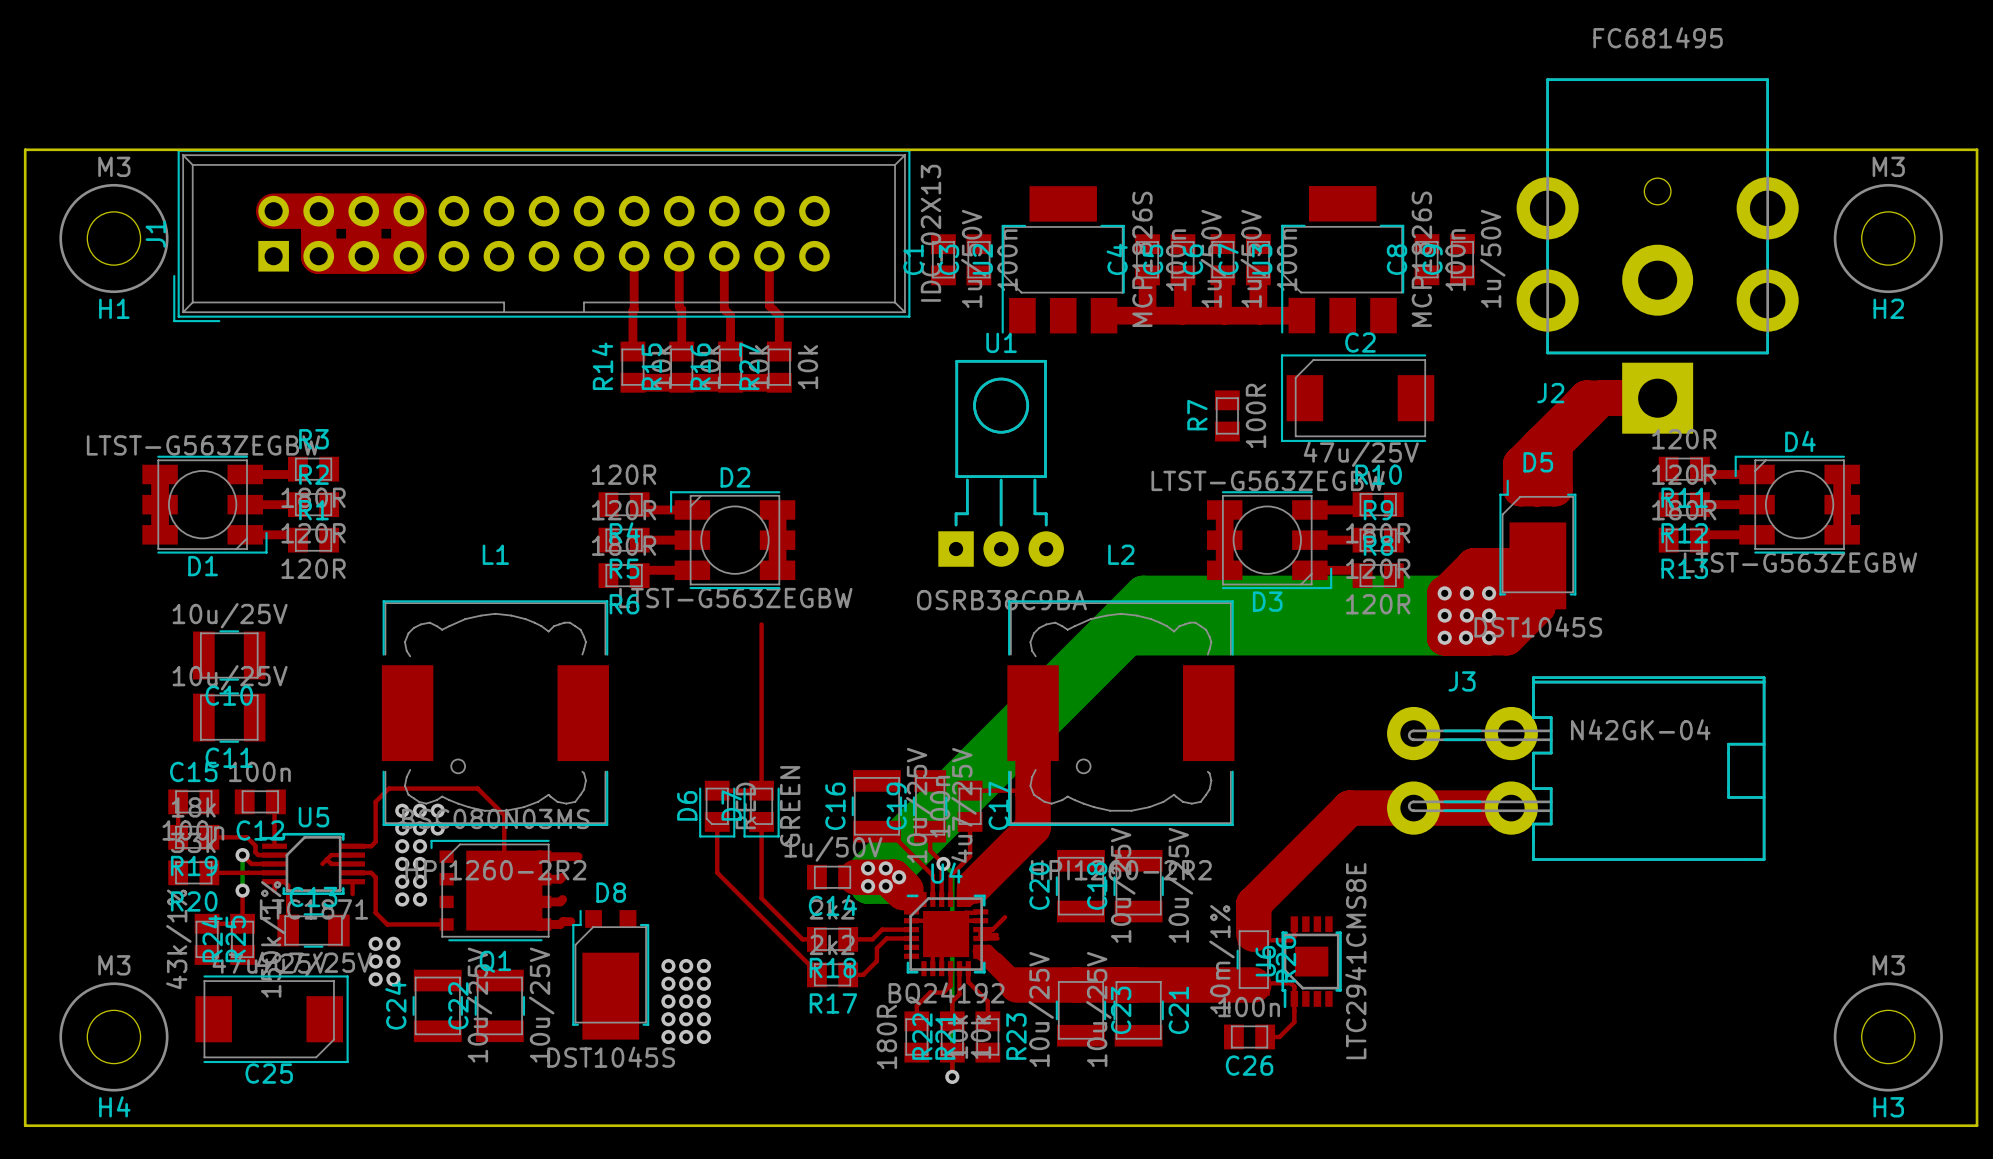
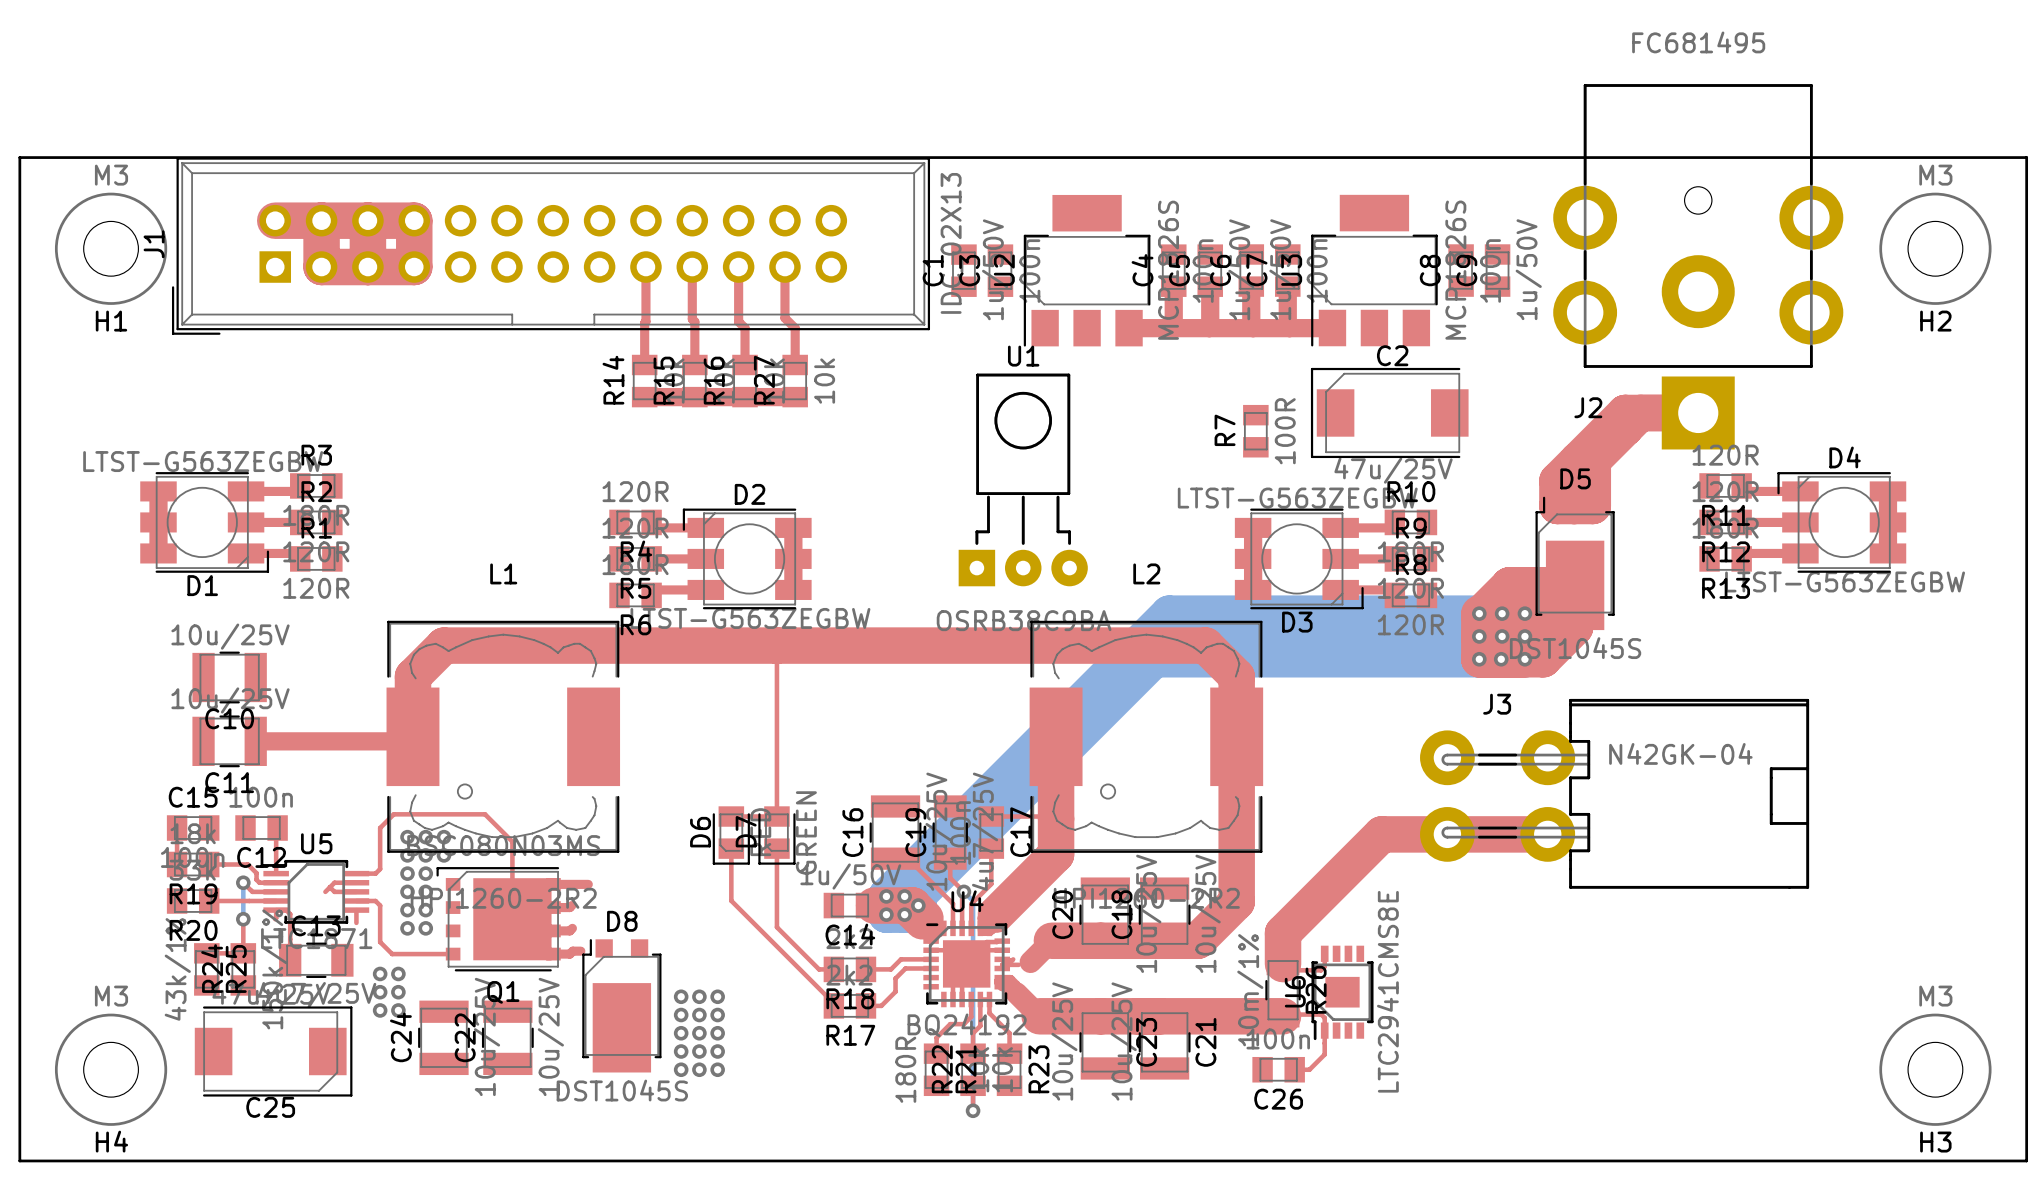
top track: none -> (412, 736) (412, 676) (444, 645) (1205, 645) (1236, 676) (1236, 901) (1197, 940) (1051, 940) (1030, 962)
top track: none -> (255, 741) (408, 741)
top track: (1005, 917) (992, 929) (980, 929) (980, 938) (997, 938) -> none

